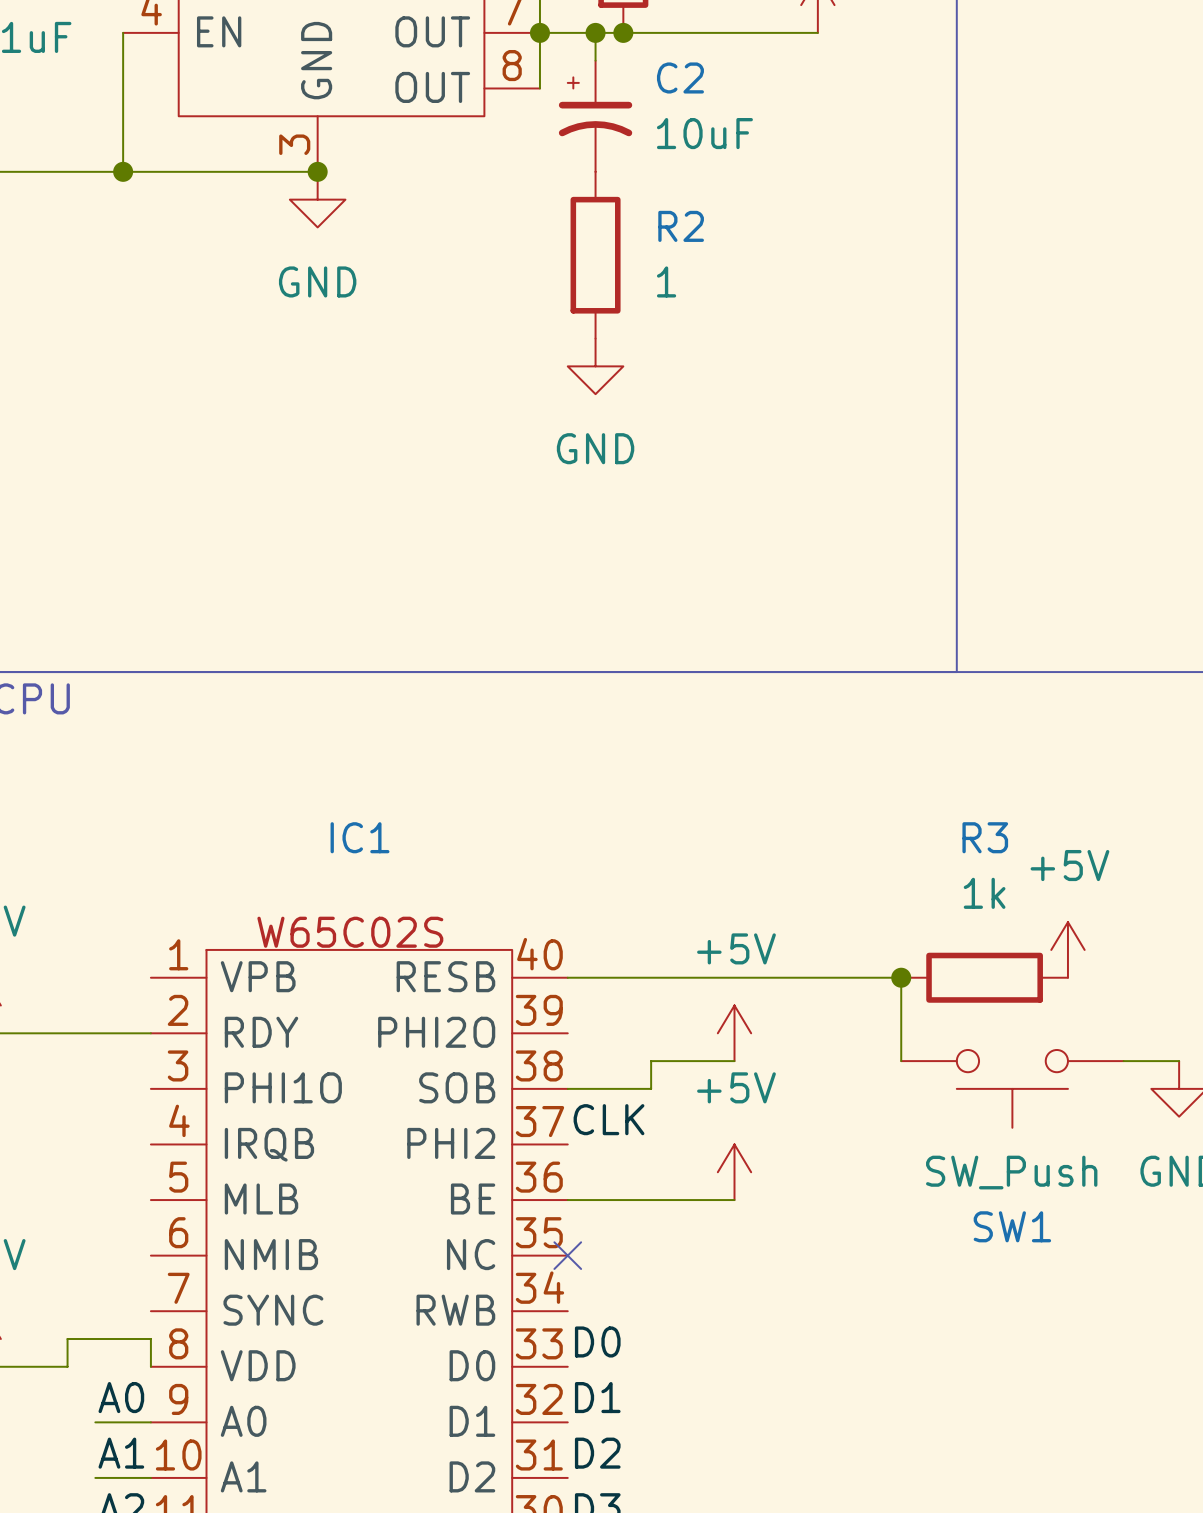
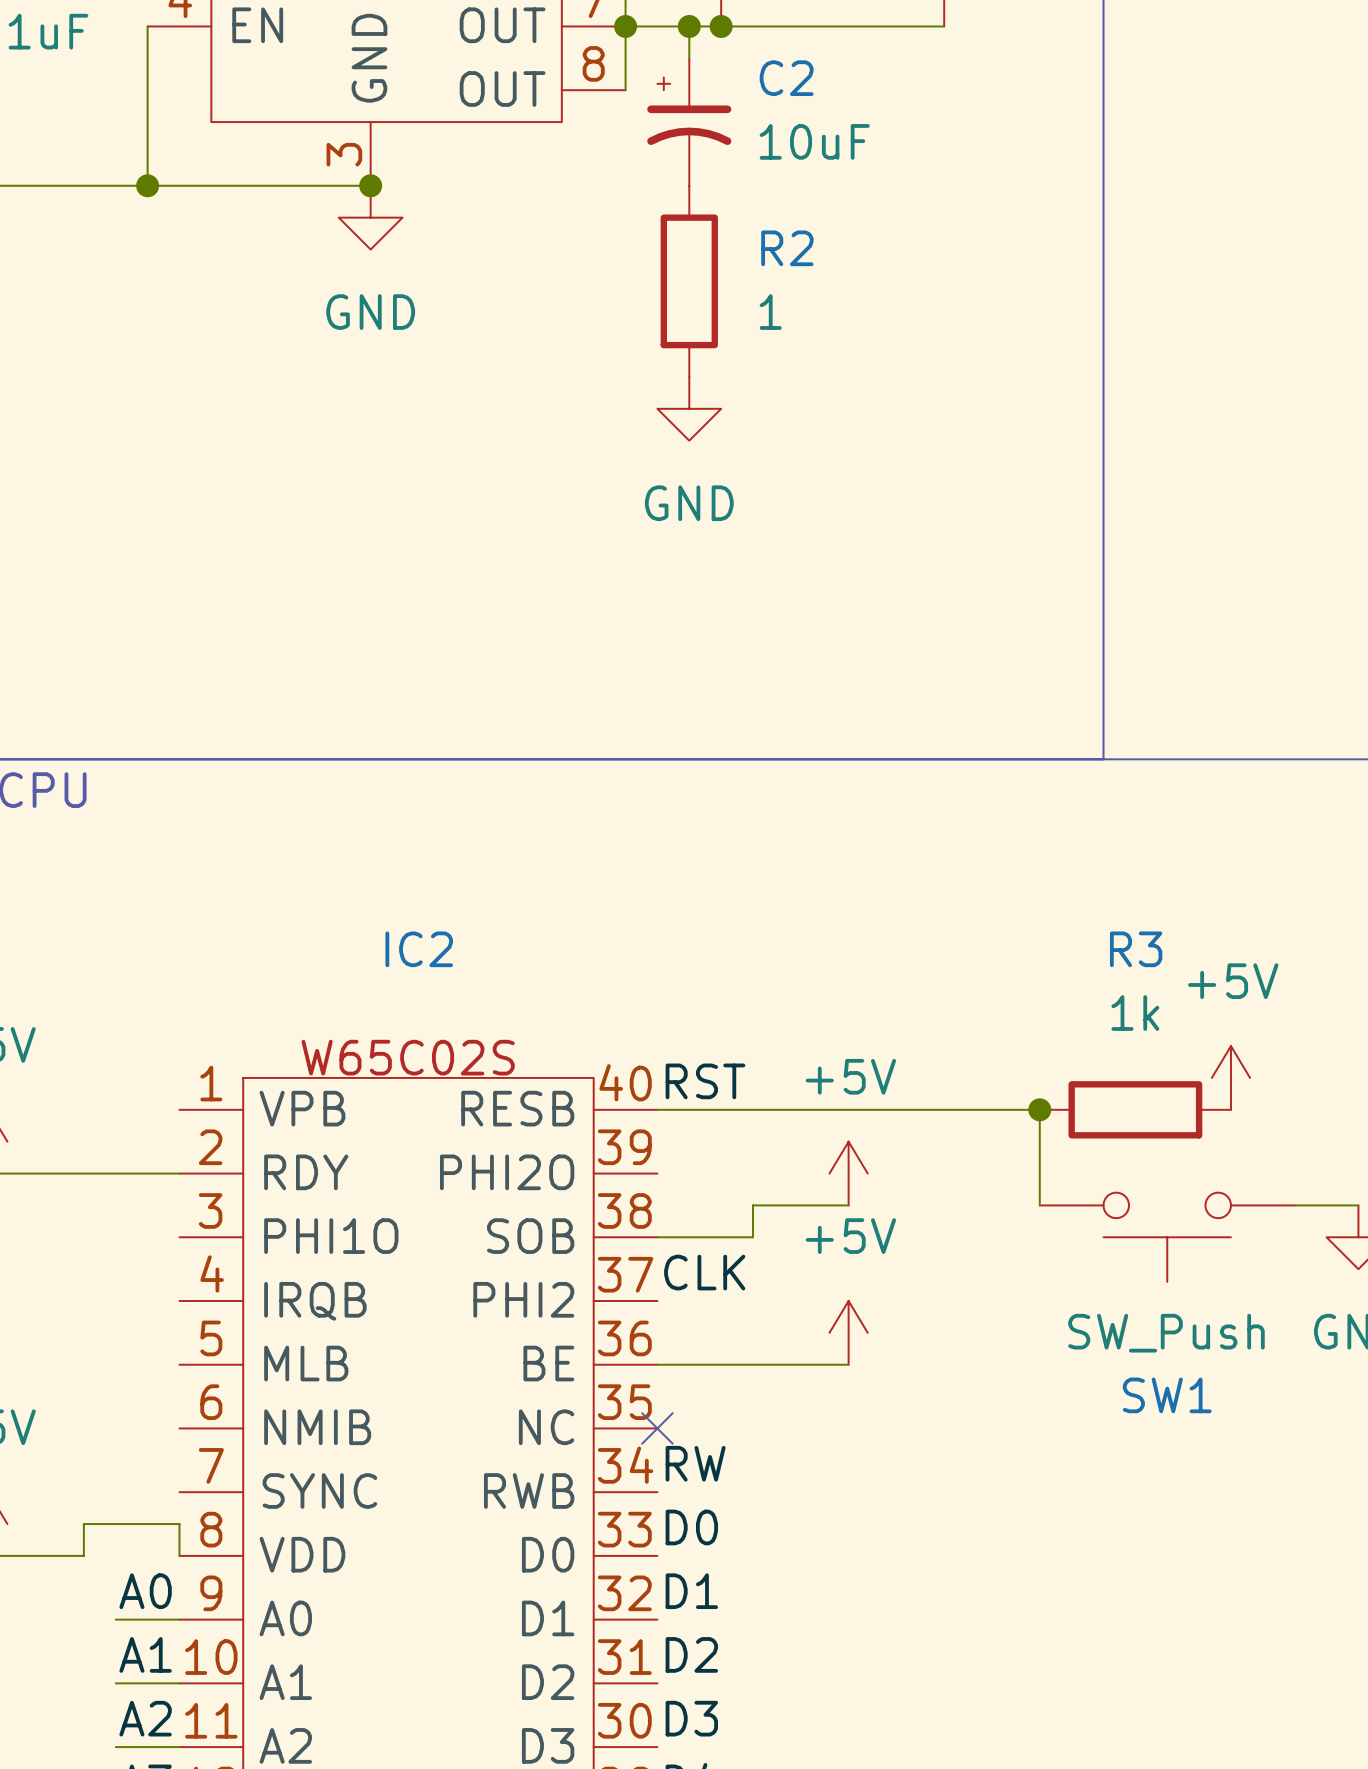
IC1 name: IC1 (360, 837) -> IC2 (419, 949)
label: none -> RST (705, 1081)
label: none -> RW (695, 1463)

